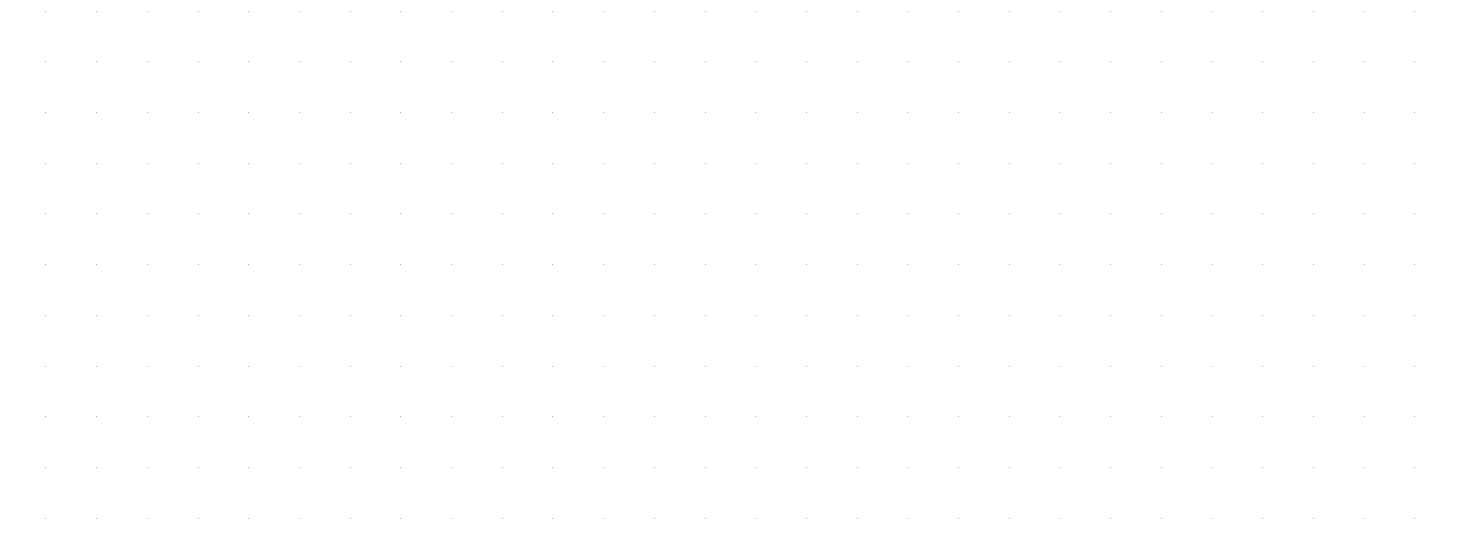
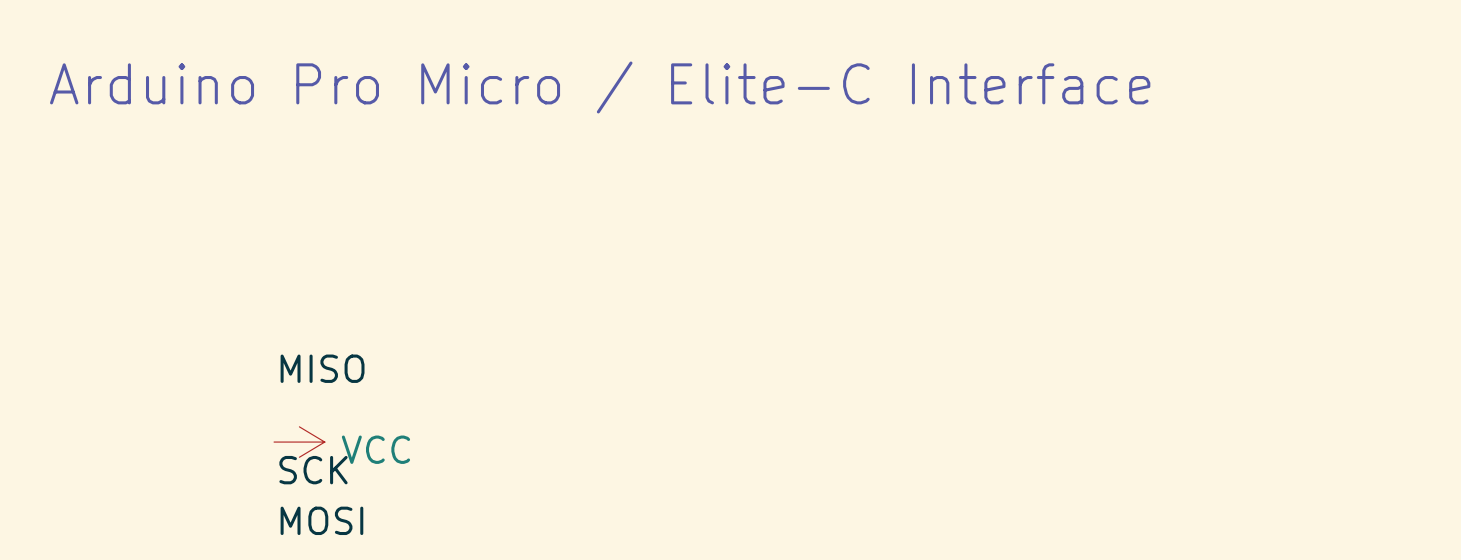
text: none -> Arduino Pro Micro / Elite-C Interface (600, 87)
label: none -> MISO (322, 368)
power symbol: none -> VCC (299, 442)
label: none -> SCK (313, 470)
label: none -> MOSI (321, 520)

